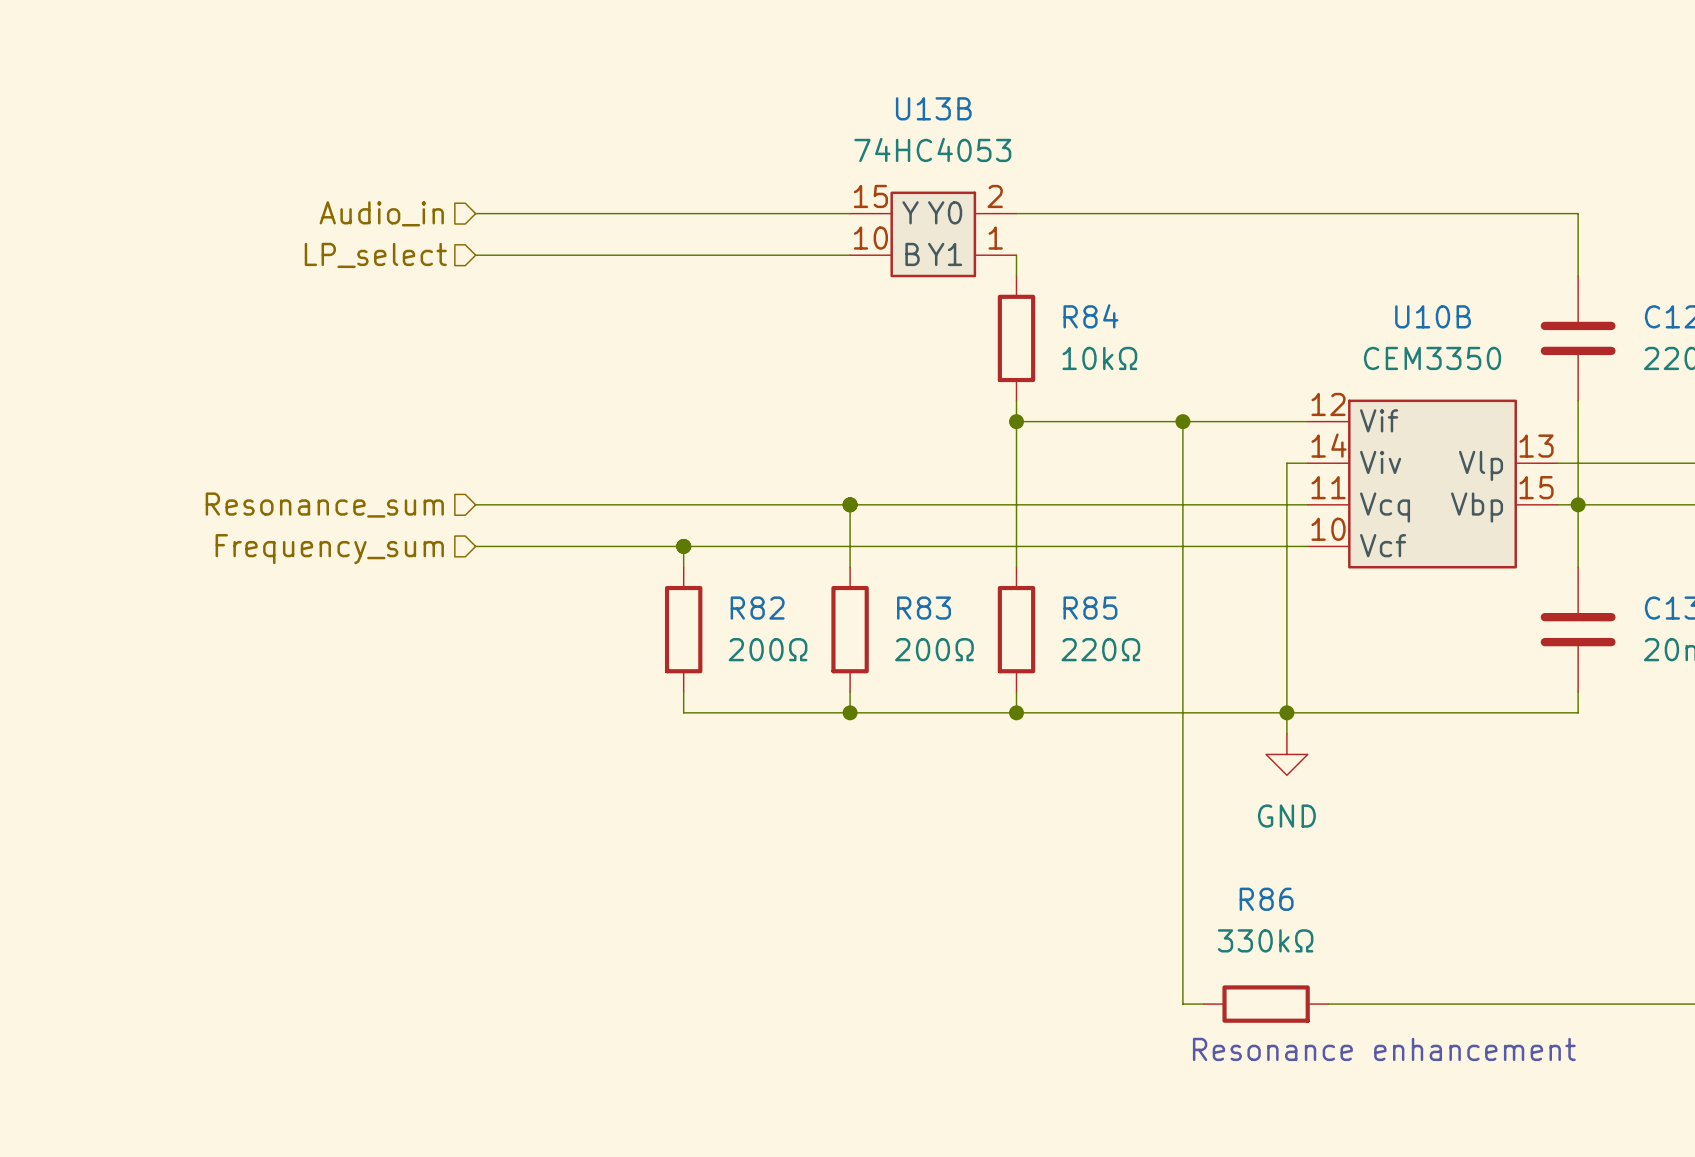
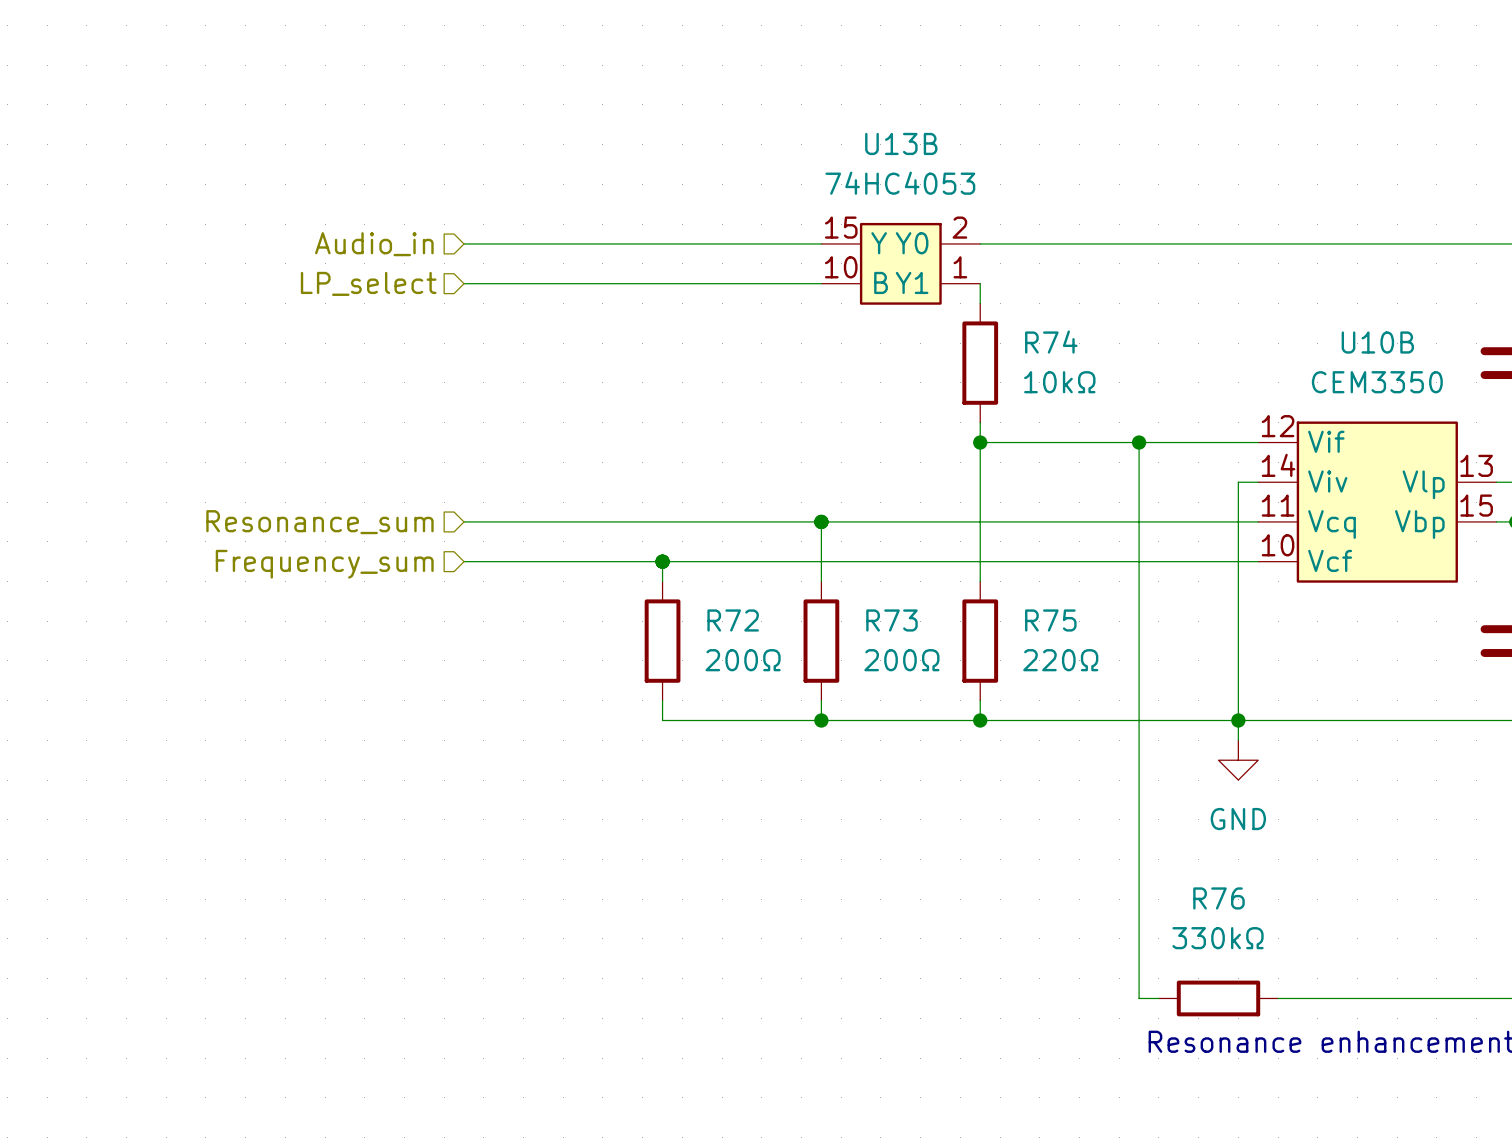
R84 name: R84 (1090, 316) -> R74 (1051, 342)
R82 name: R82 (757, 608) -> R72 (733, 620)
R83 name: R83 (924, 608) -> R73 (891, 620)
R85 name: R85 (1090, 608) -> R75 (1050, 620)
R86 name: R86 (1266, 899) -> R76 (1218, 898)

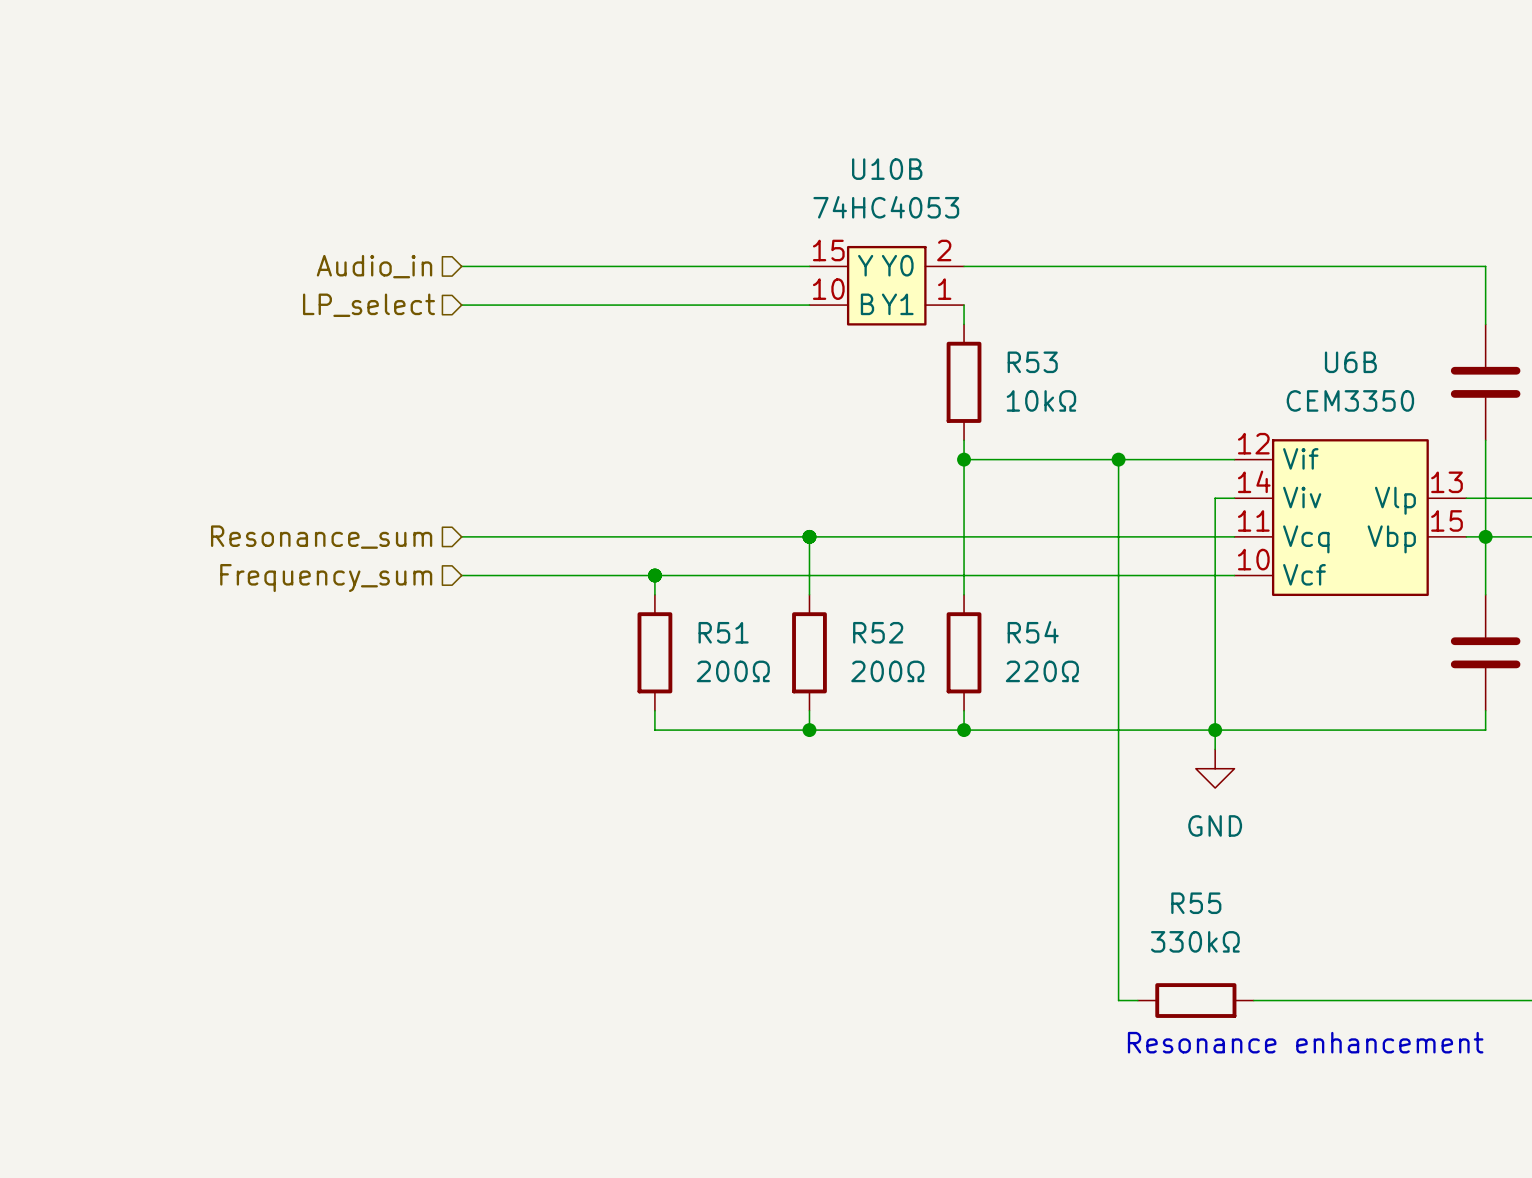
U13B name: U13B (901, 143) -> U10B (887, 169)
R74 name: R74 (1051, 342) -> R53 (1032, 362)
U10B name: U10B (1377, 342) -> U6B (1350, 362)
R72 name: R72 (733, 620) -> R51 (723, 632)
R73 name: R73 (891, 620) -> R52 (878, 632)
R75 name: R75 (1050, 620) -> R54 (1033, 632)
R76 name: R76 (1218, 898) -> R55 (1196, 903)

